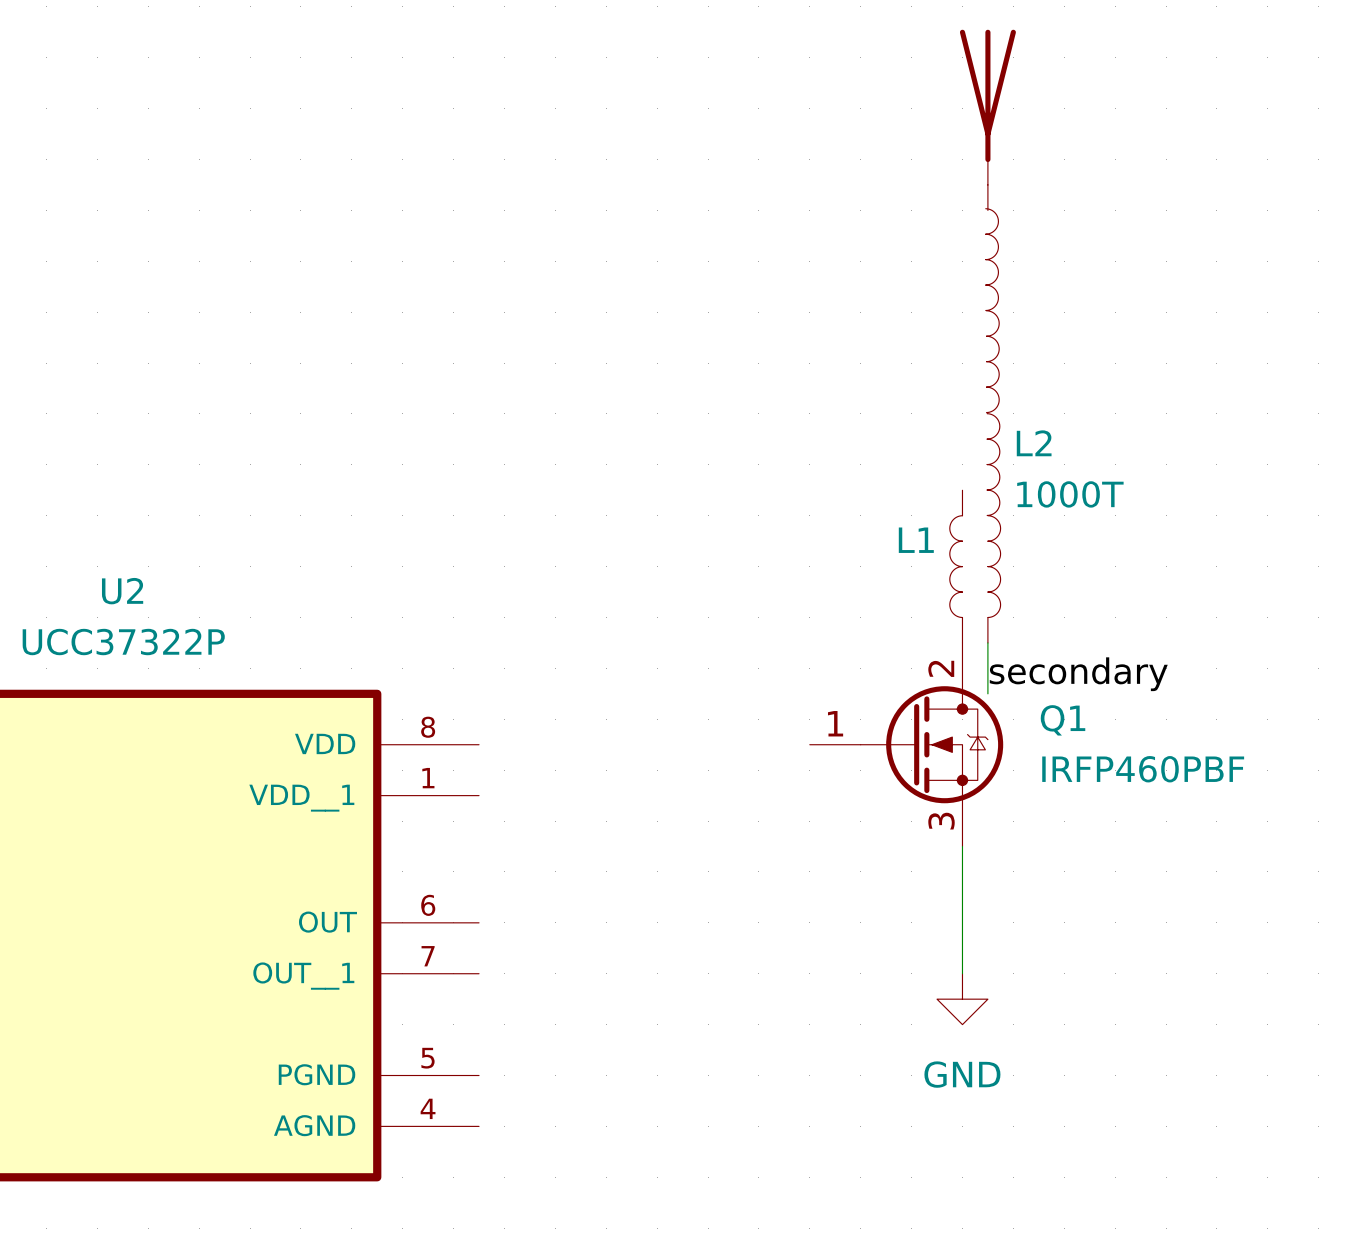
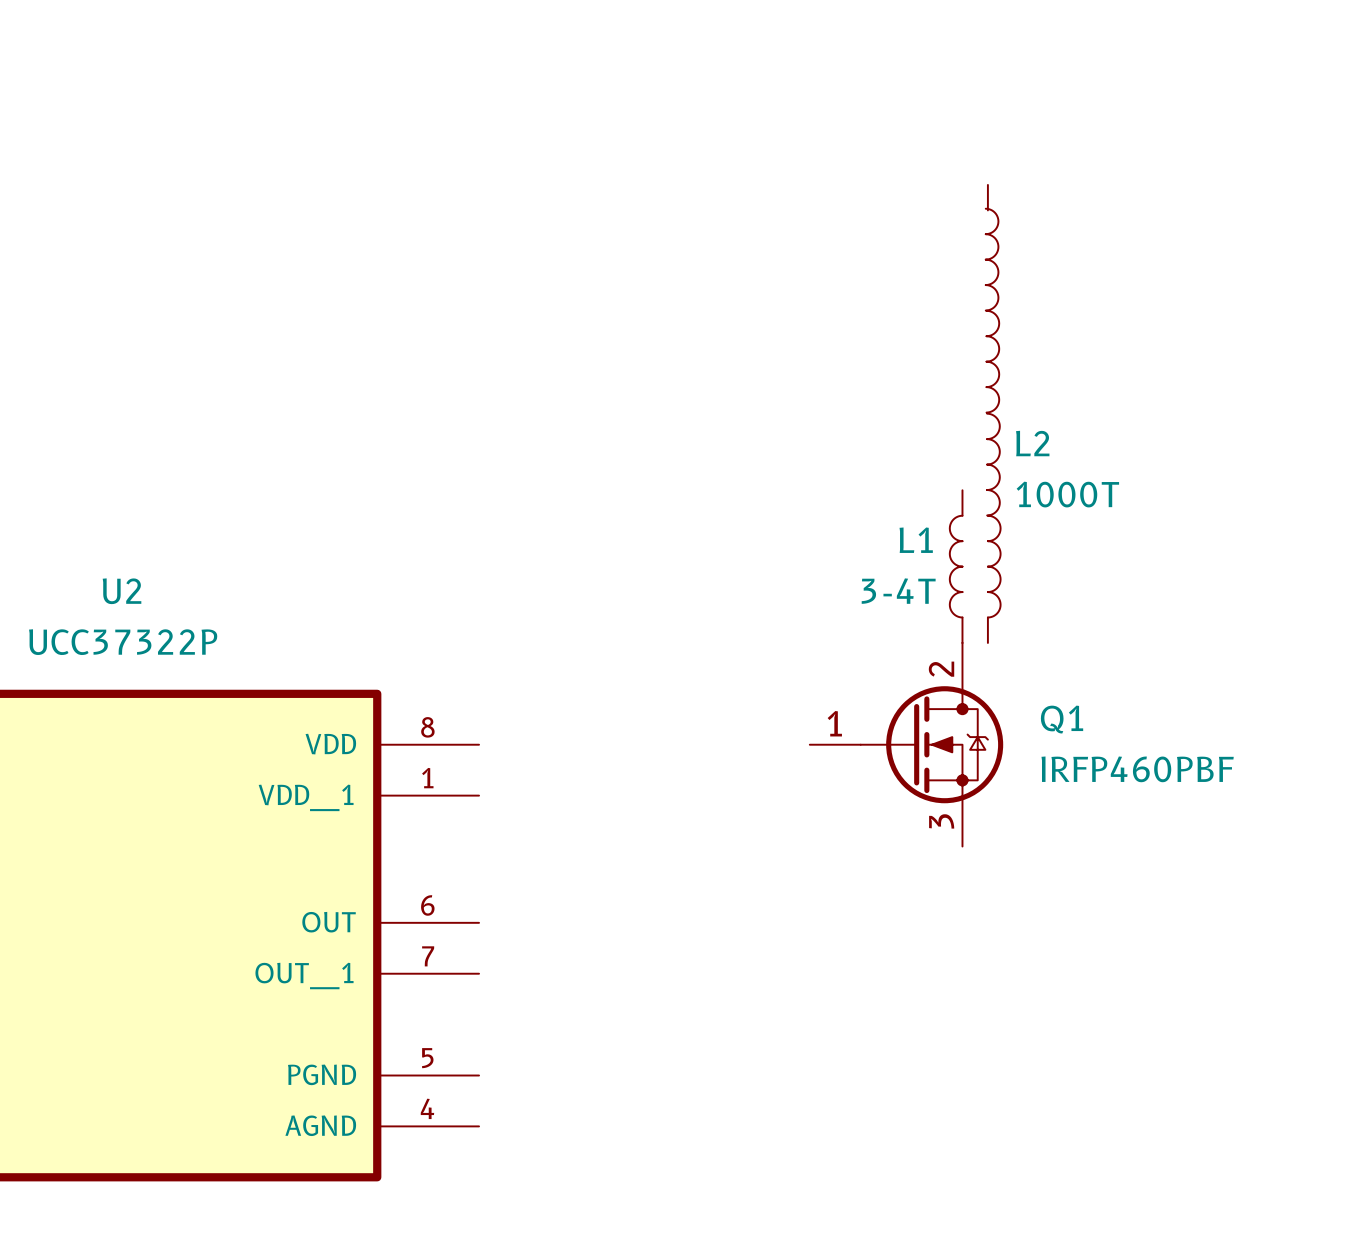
part: (987, 107) -> none
L1 value: none -> 3-4T (898, 591)
wire: (987, 642) (987, 693) -> none
label: secondary (1078, 674) -> none
wire: (962, 846) (962, 973) -> none
power symbol: GND (962, 999) -> none

